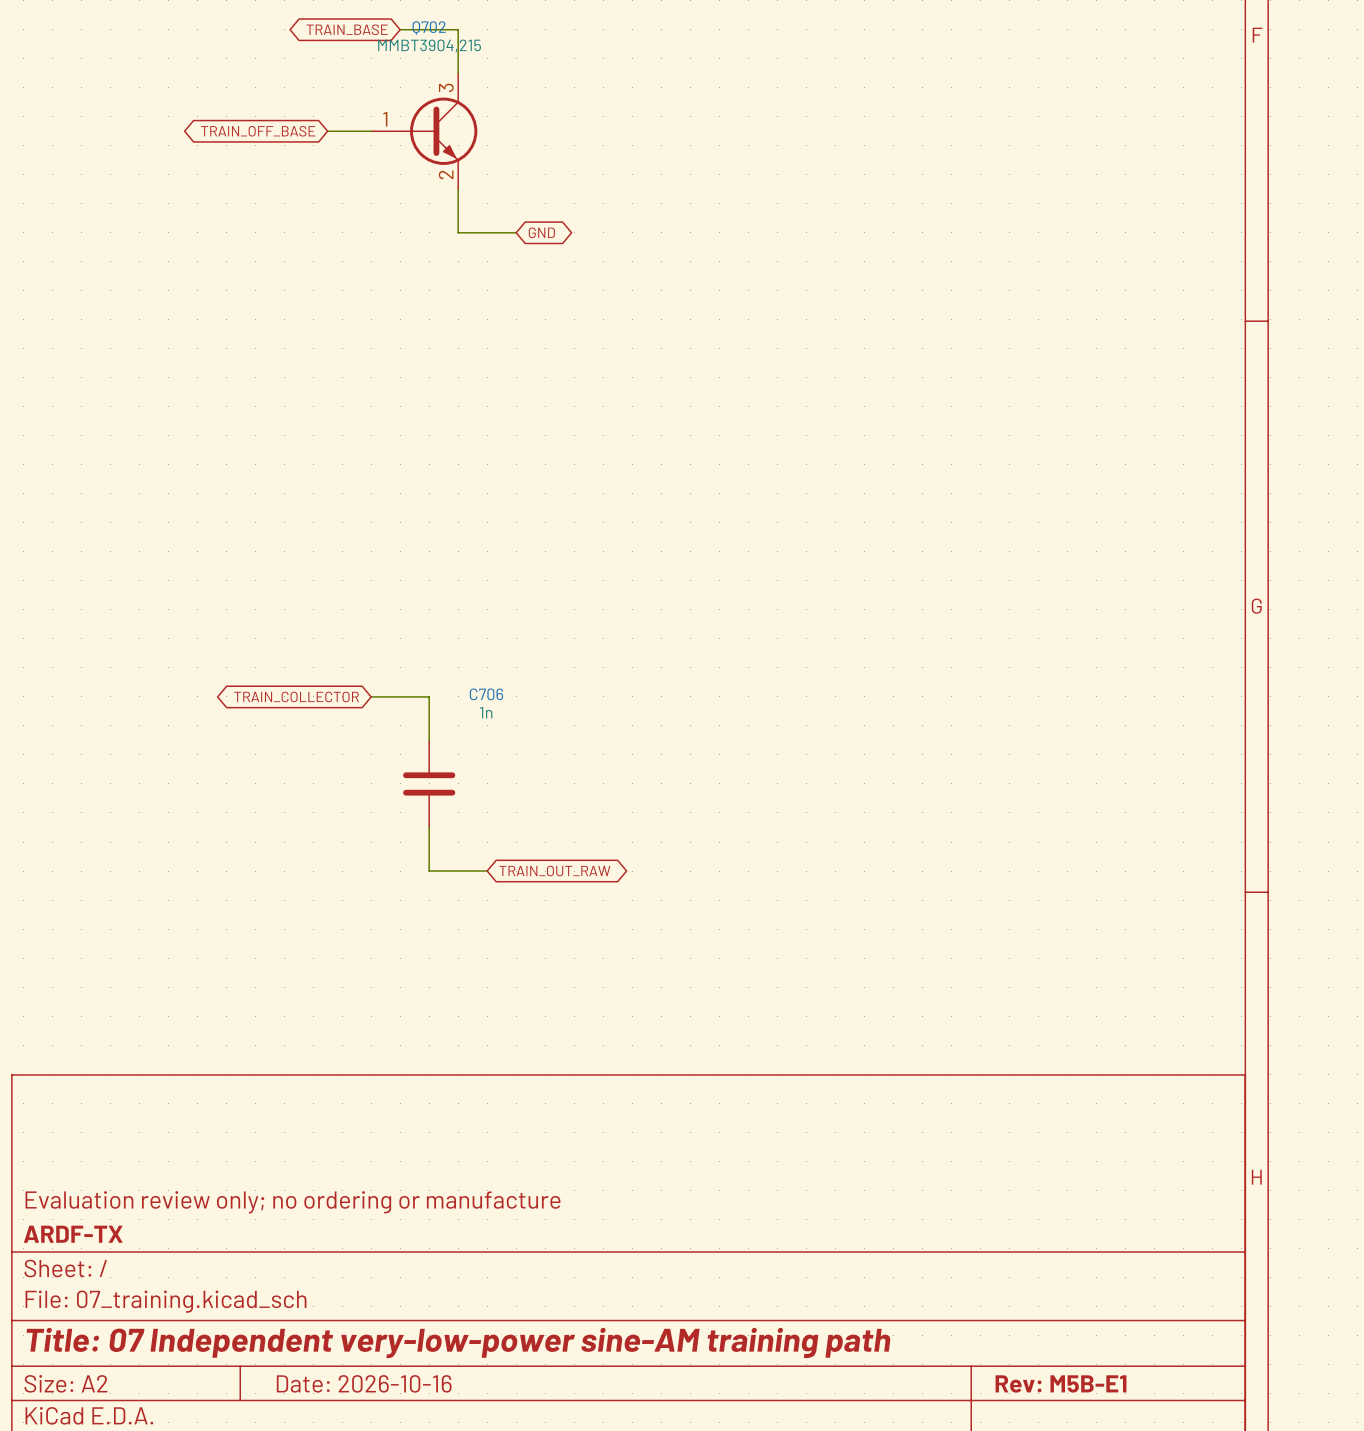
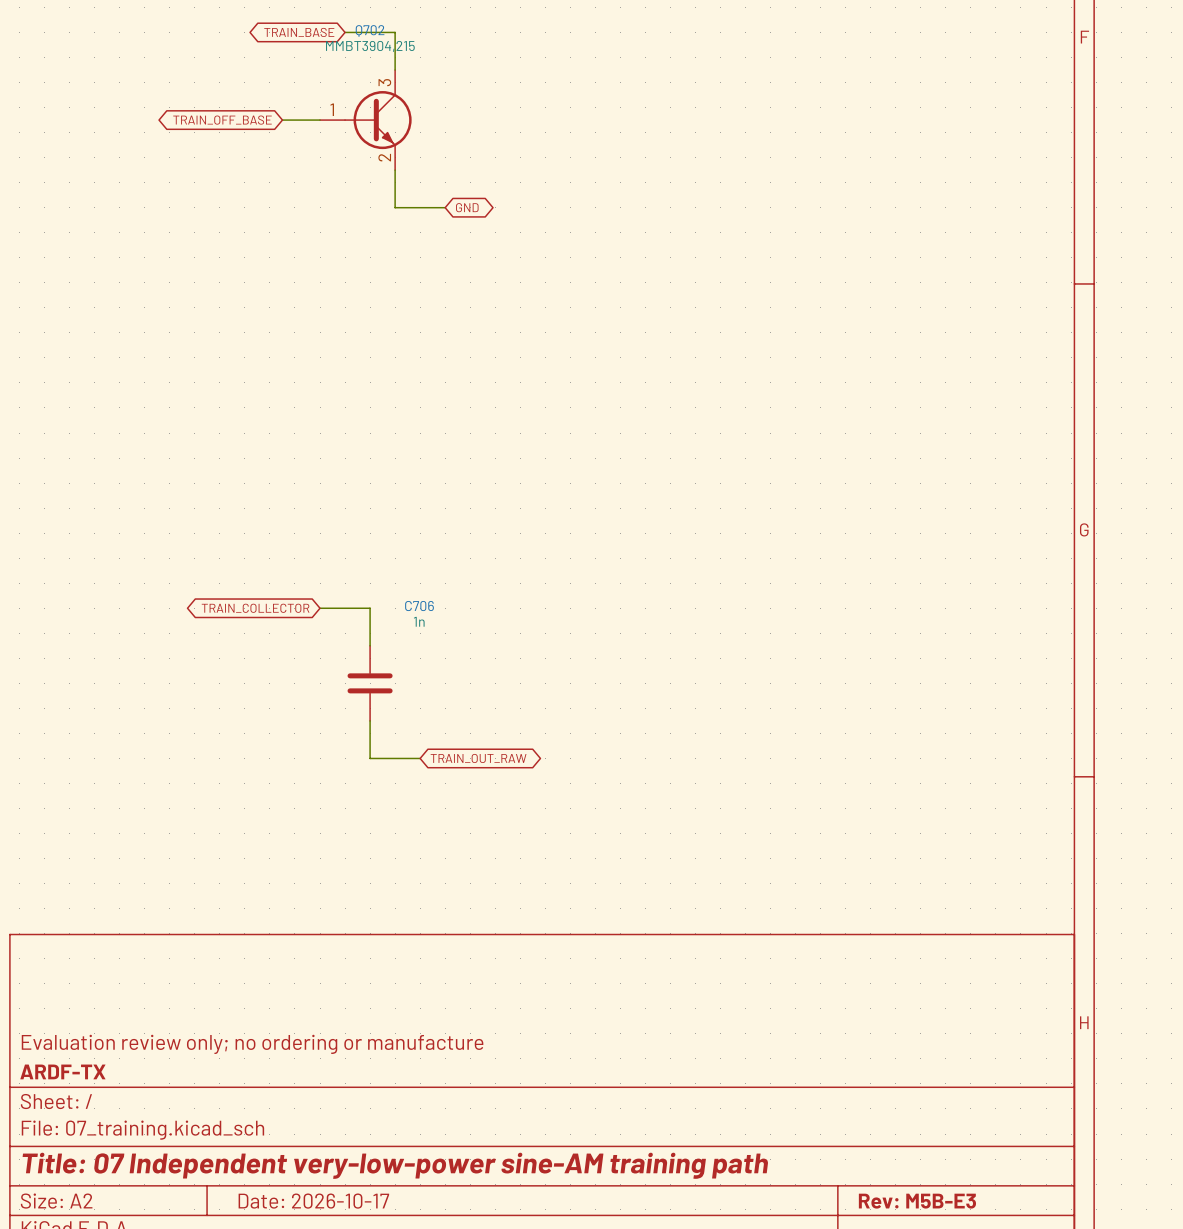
title block: Date: 2026-10-16 (364, 1383) -> Date: 2026-10-17 (313, 1201)
title block: Rev: M5B-E1 (1061, 1383) -> Rev: M5B-E3 (917, 1201)

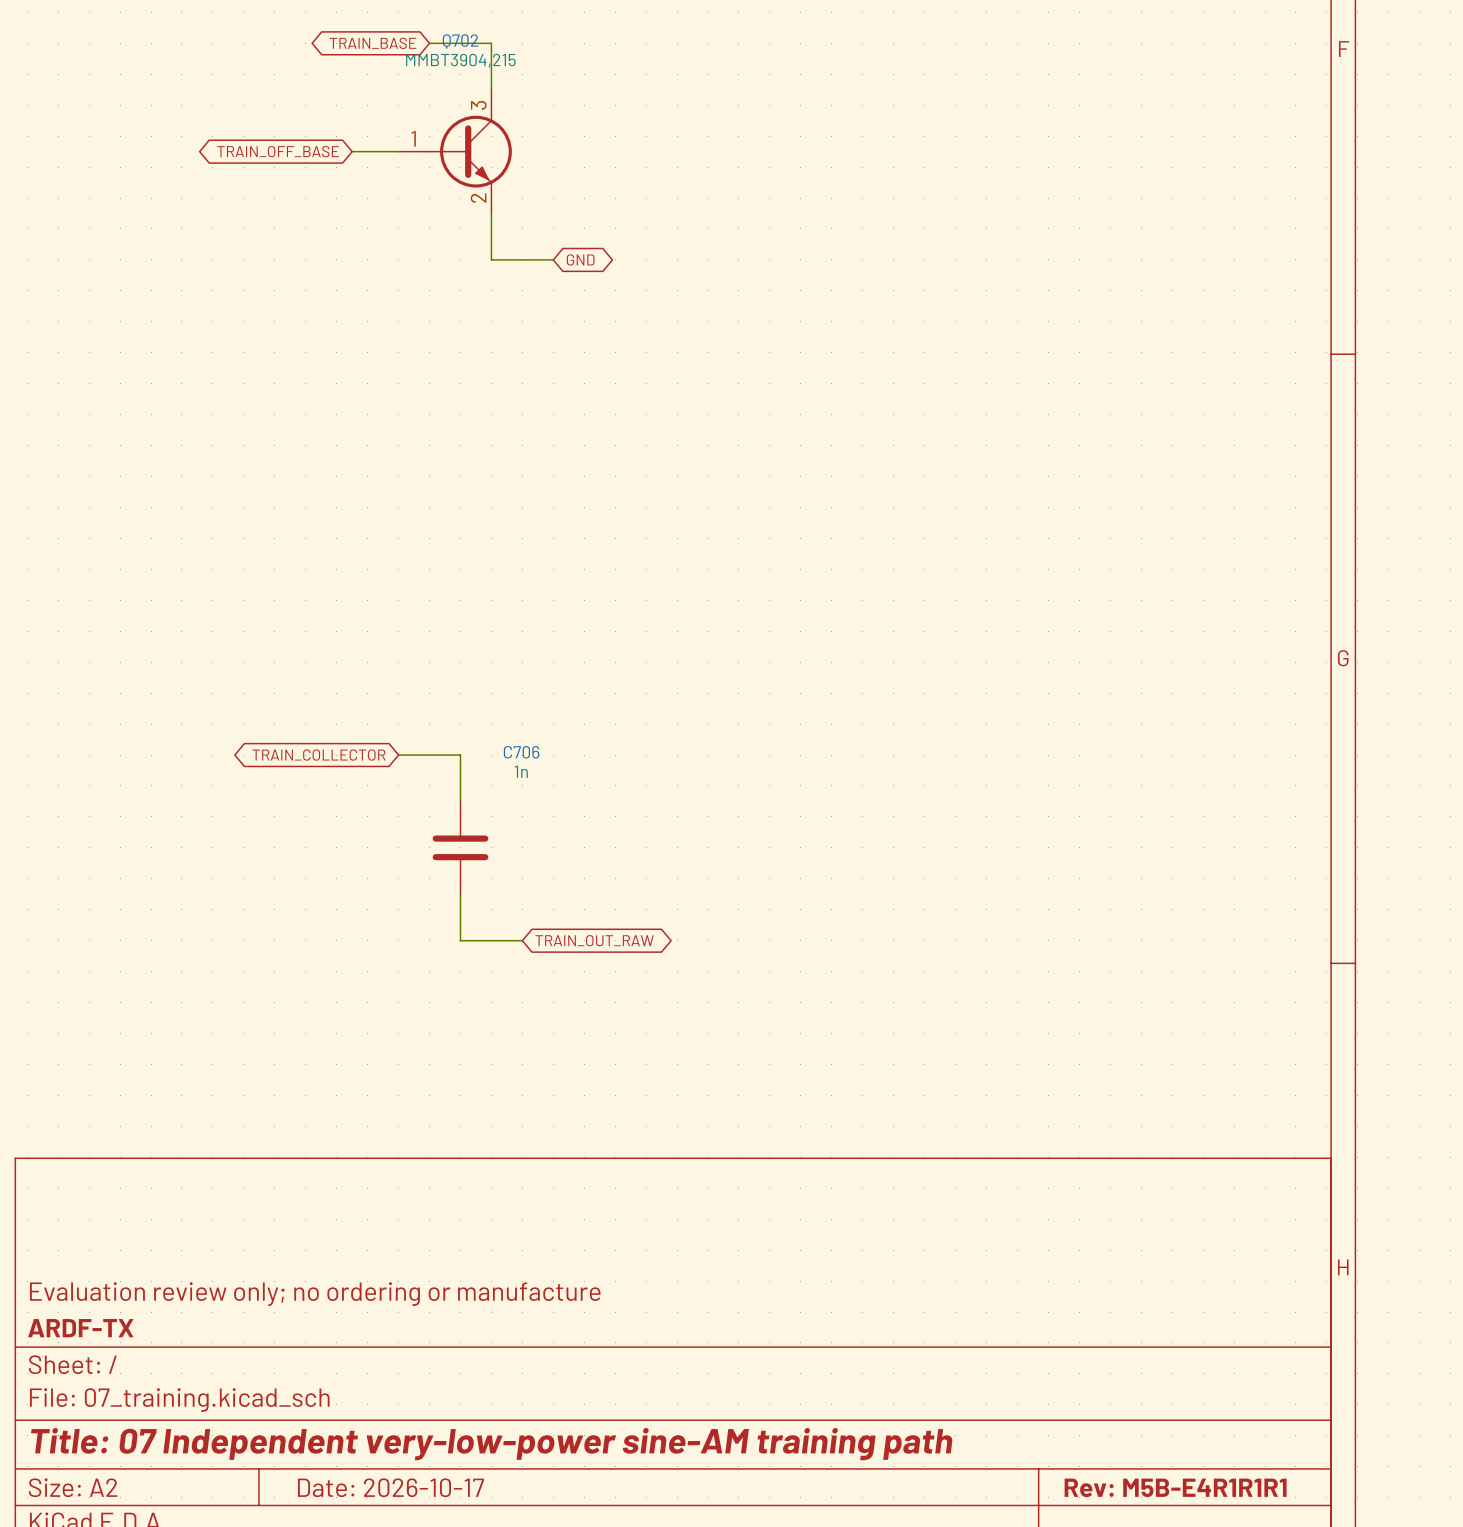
title block: Rev: M5B-E3 (917, 1201) -> Rev: M5B-E4R1R1R1 (1175, 1487)

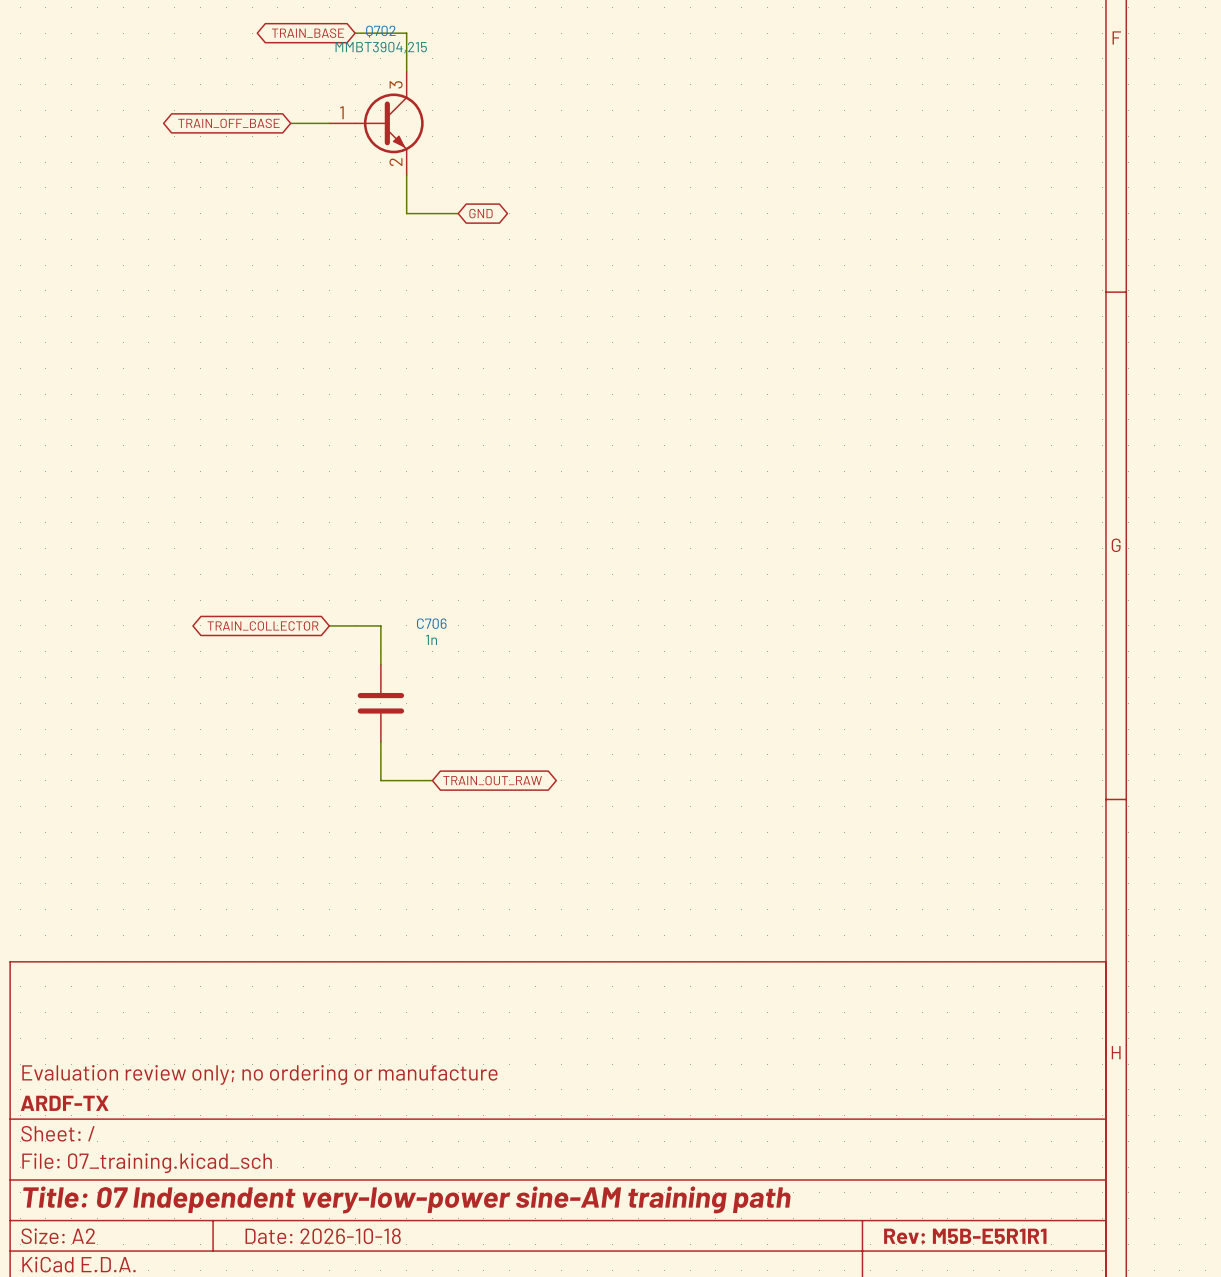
title block: Date: 2026-10-17 (391, 1487) -> Date: 2026-10-18 (323, 1236)
title block: Rev: M5B-E4R1R1R1 (1175, 1487) -> Rev: M5B-E5R1R1 (965, 1236)

